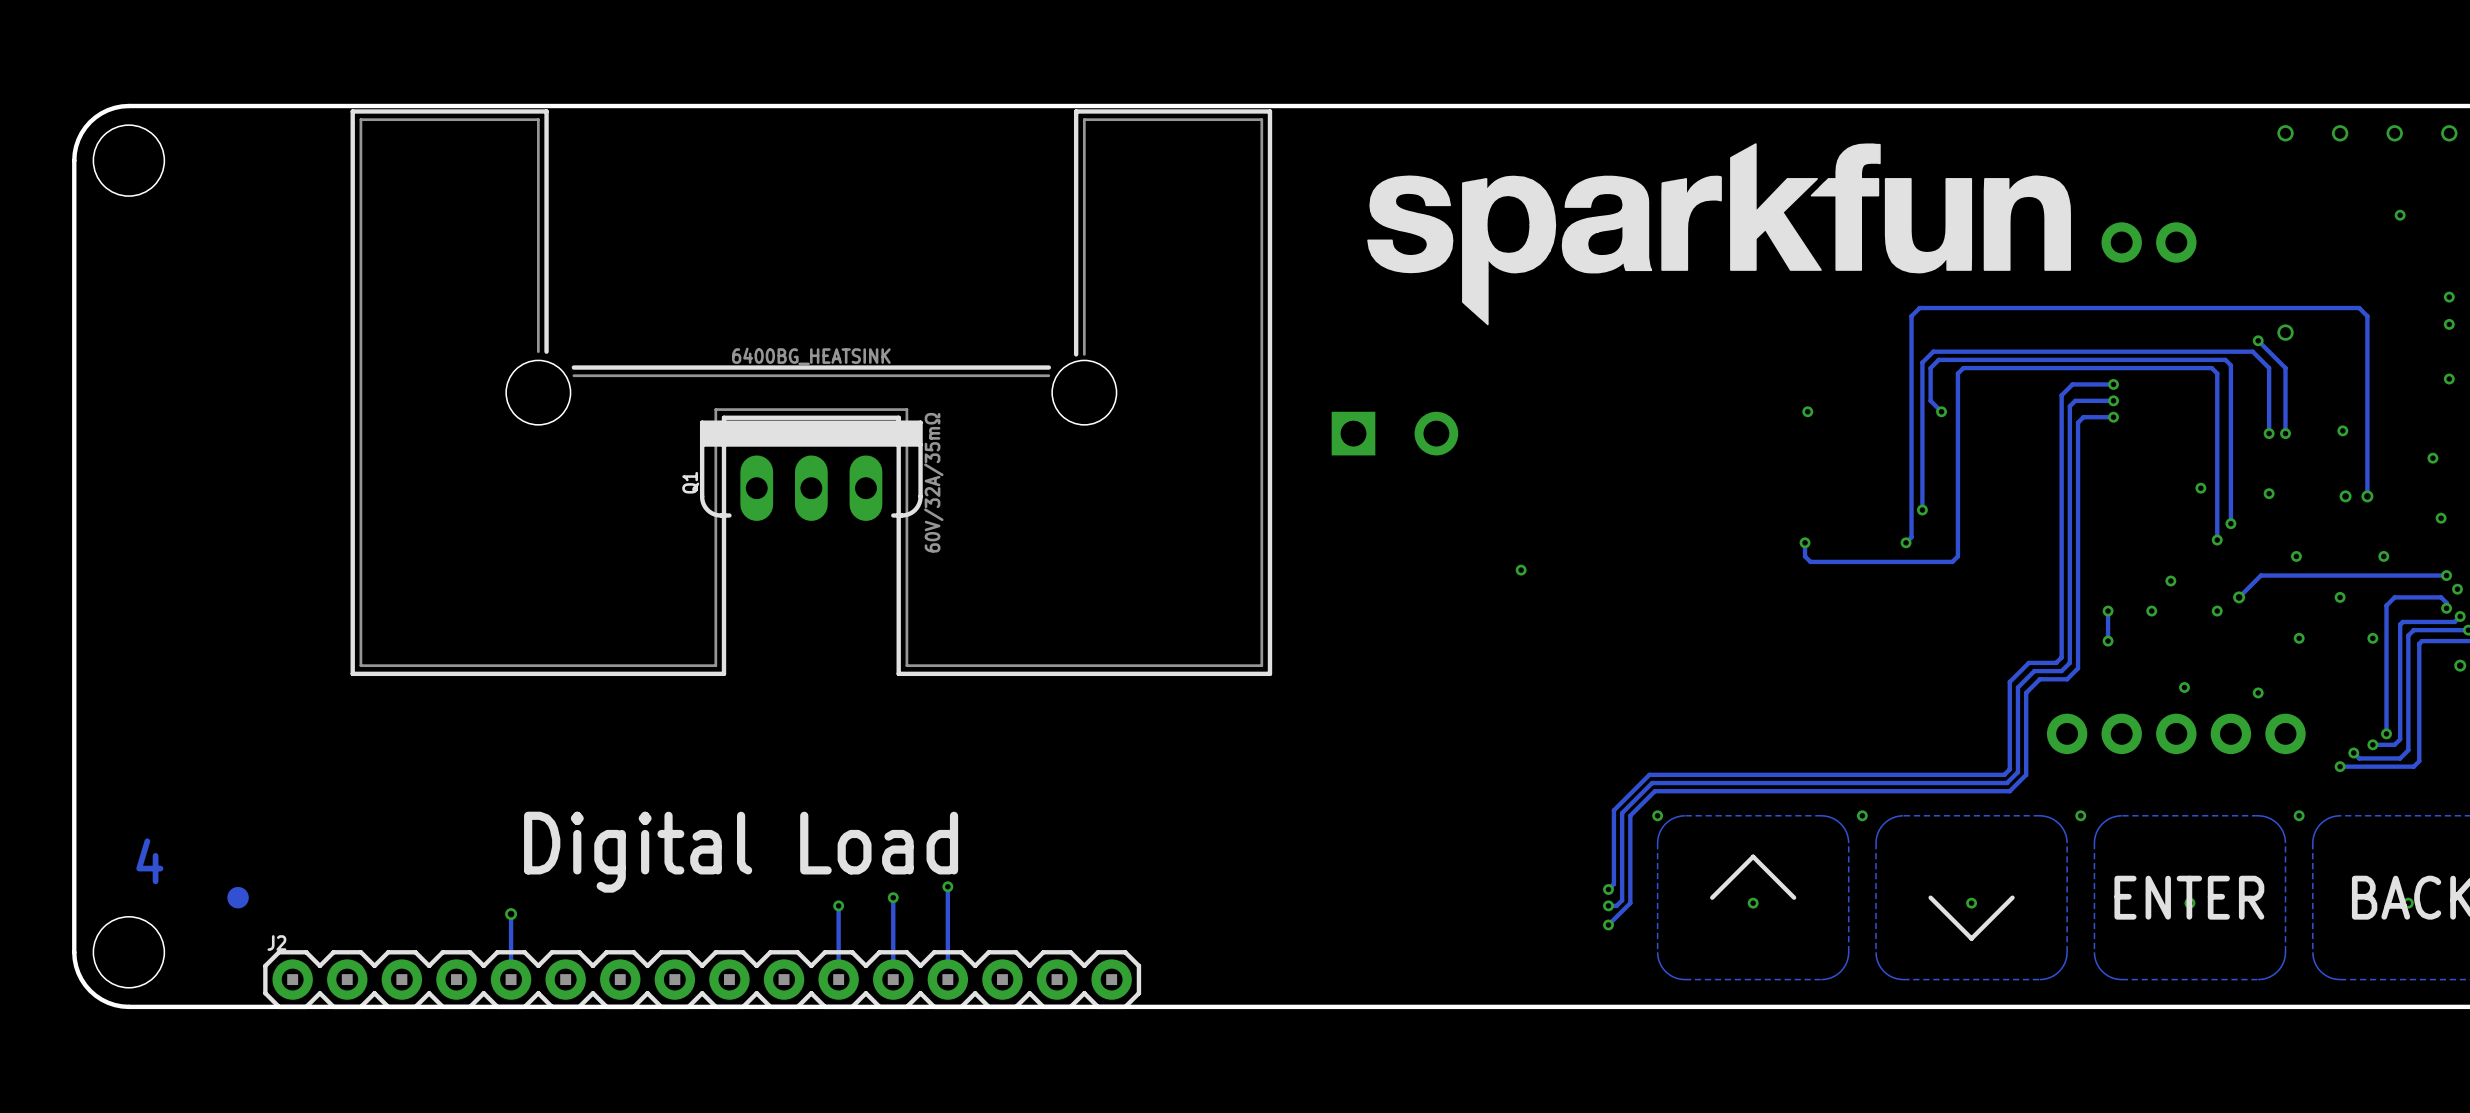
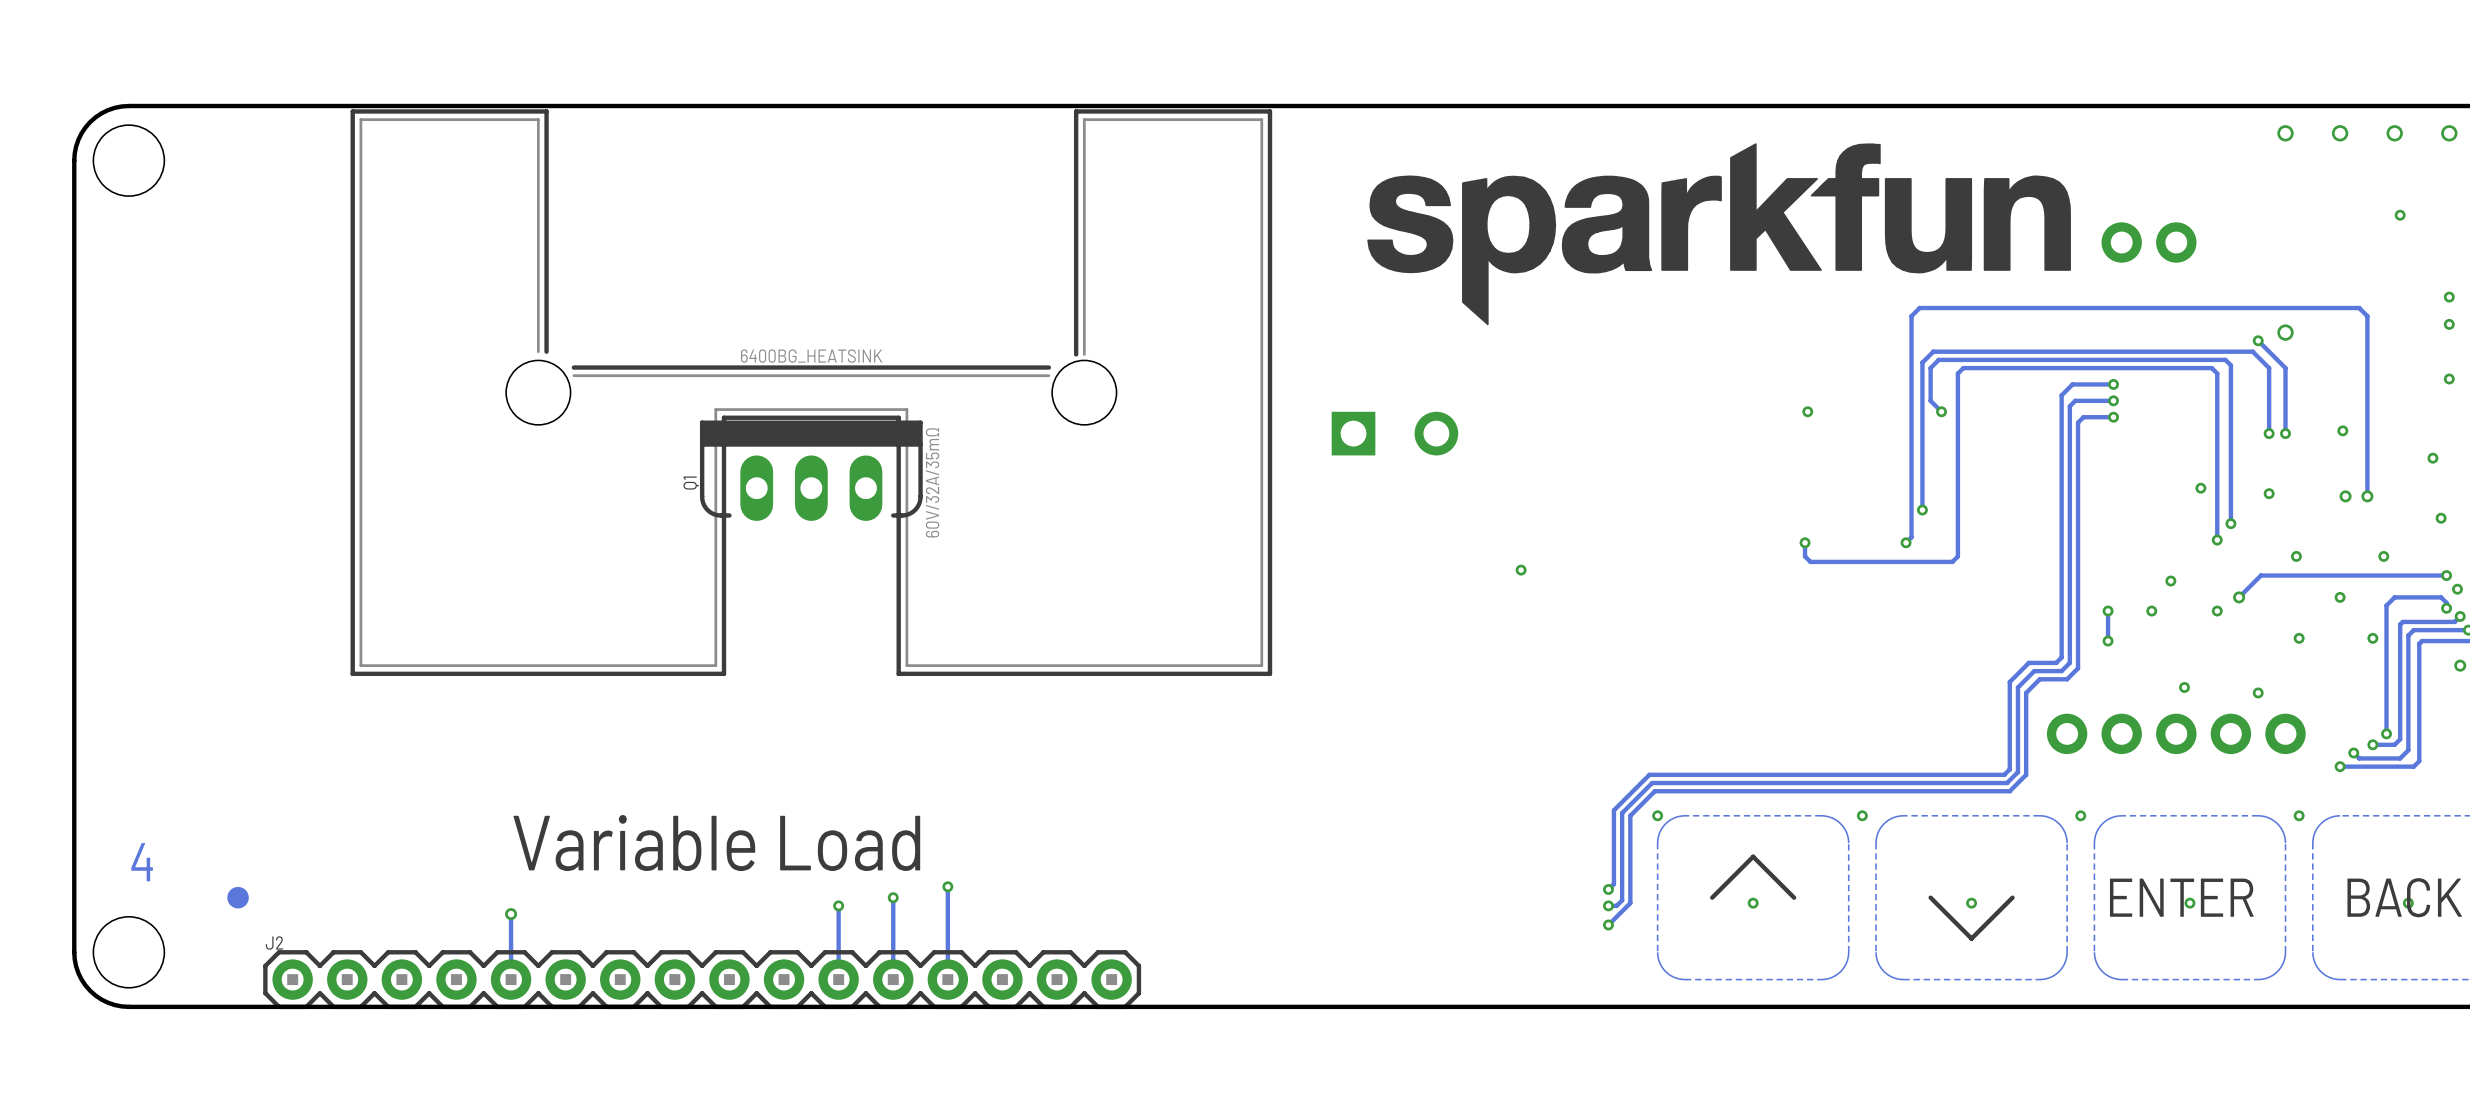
text: Digital Load (741, 852) -> Variable Load (716, 843)

